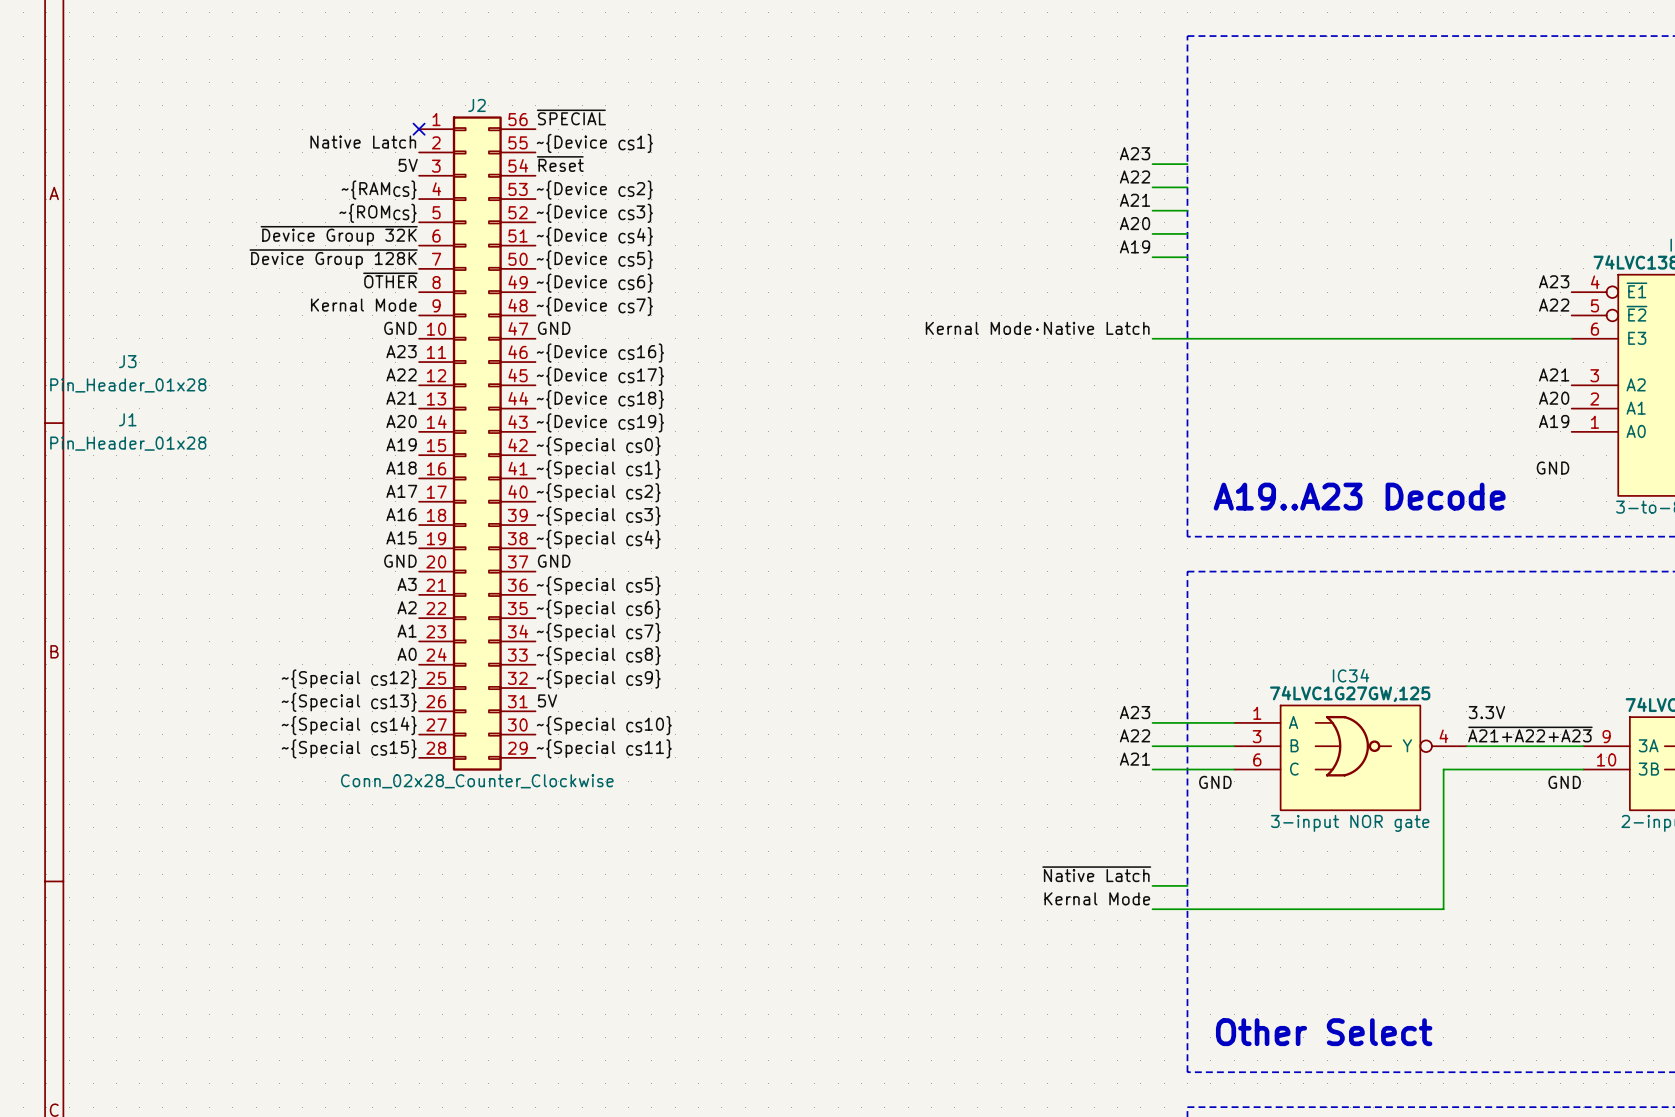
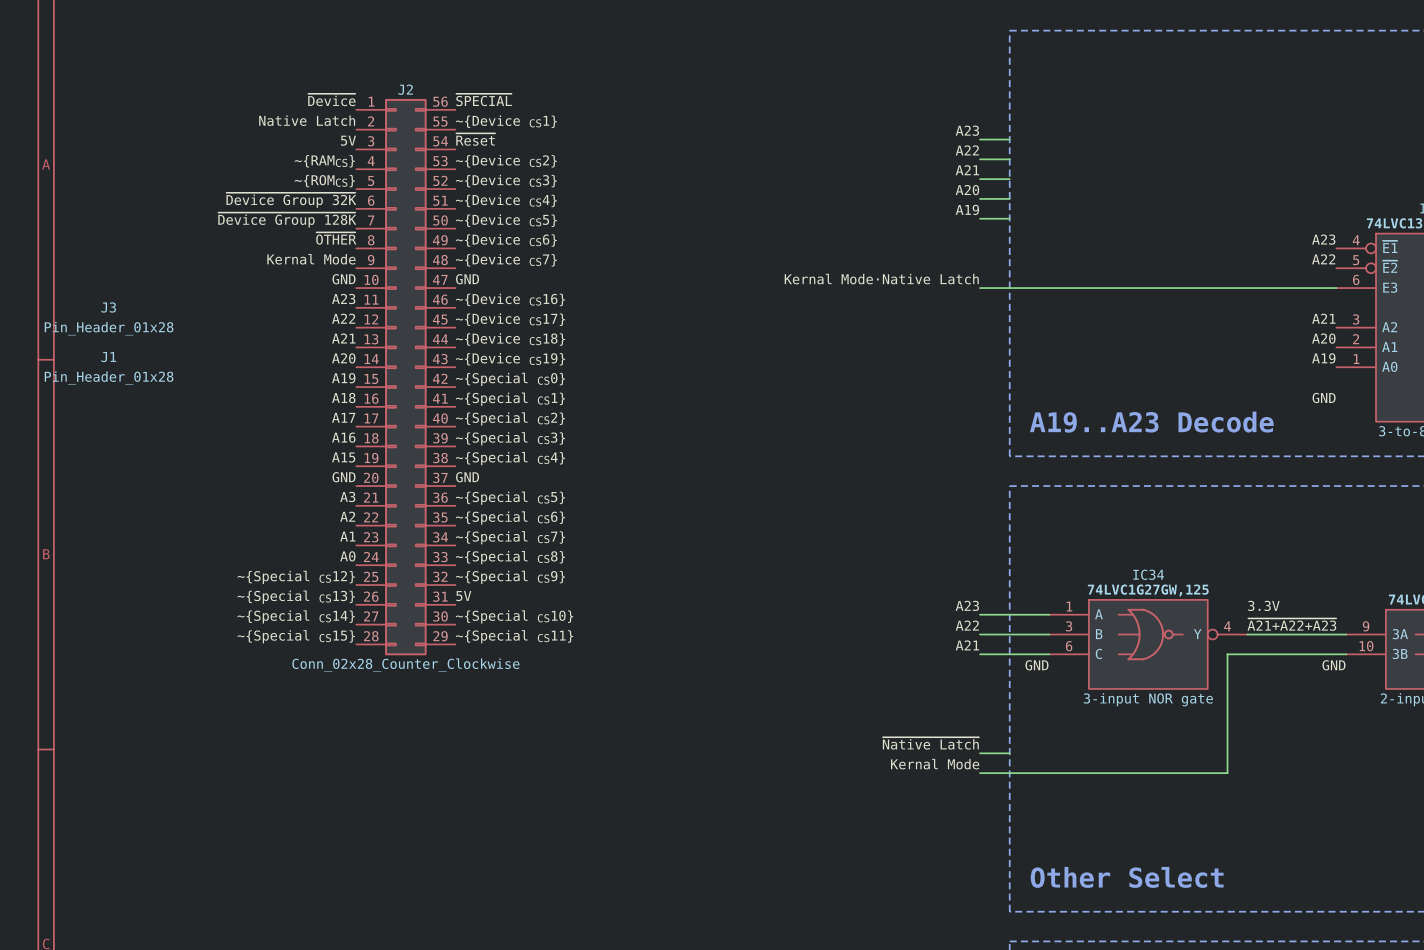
label: none -> ~{Device} (331, 99)
no-connect mark: (419, 129) -> none

